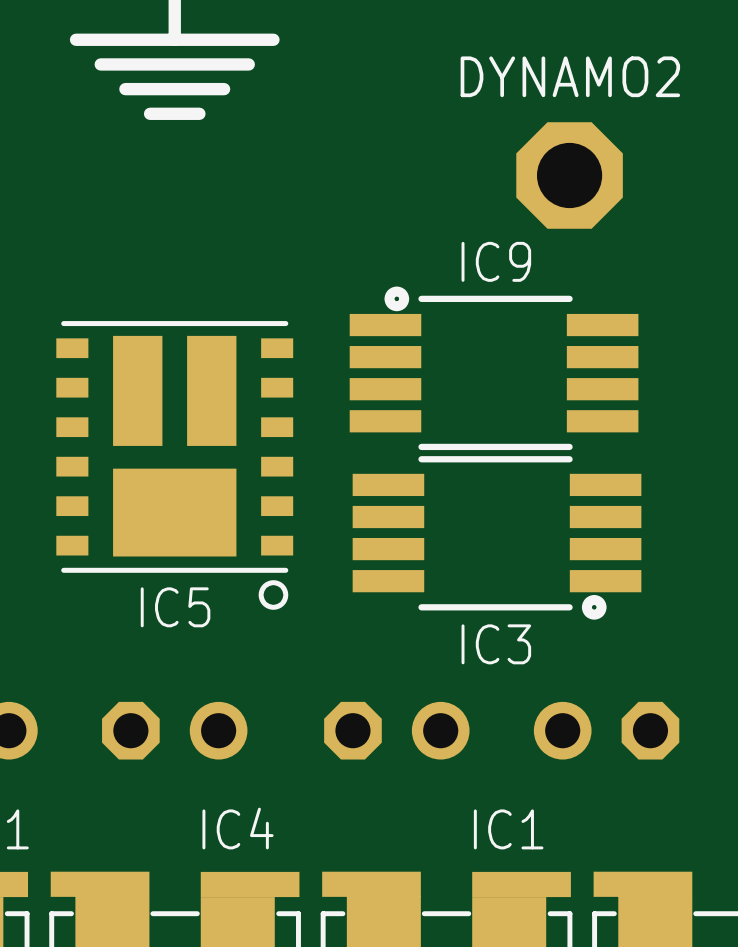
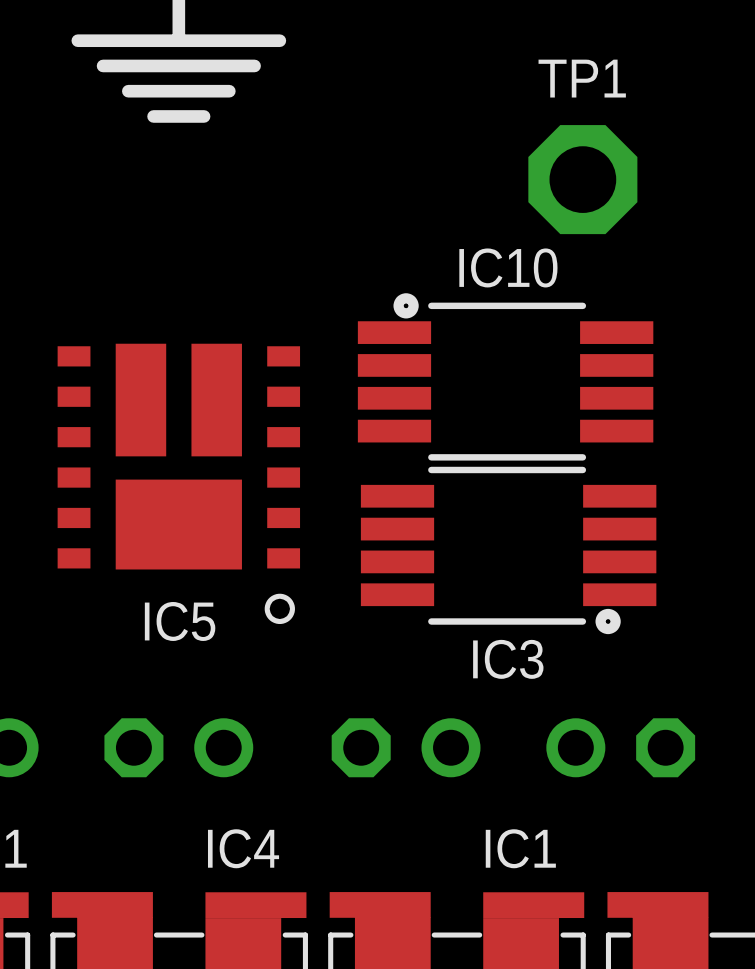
DYNAMO2 name: DYNAMO2 (570, 76) -> TP1 (582, 78)
IC9 name: IC9 (496, 261) -> IC10 (508, 267)
IC5 footprint: [56, 321, 294, 610] -> [57, 343, 301, 625]

